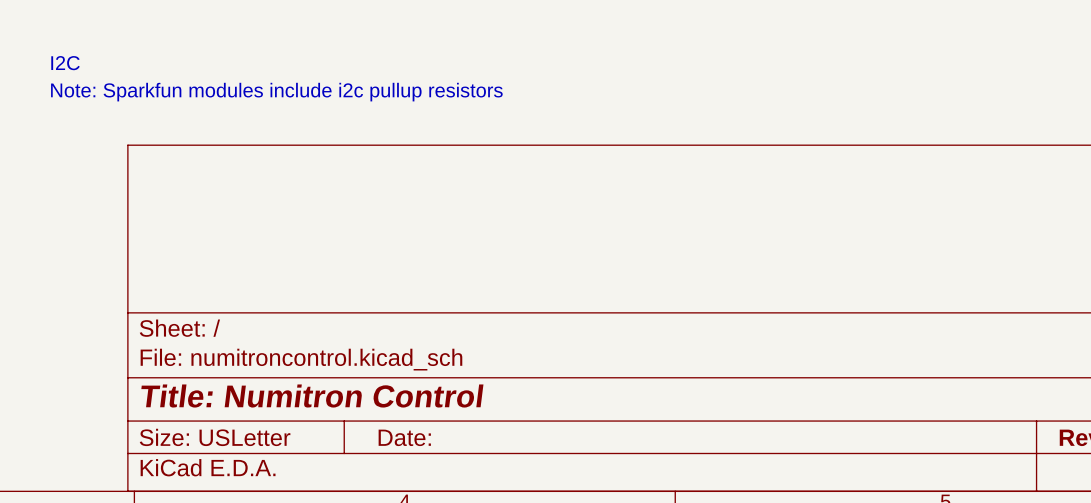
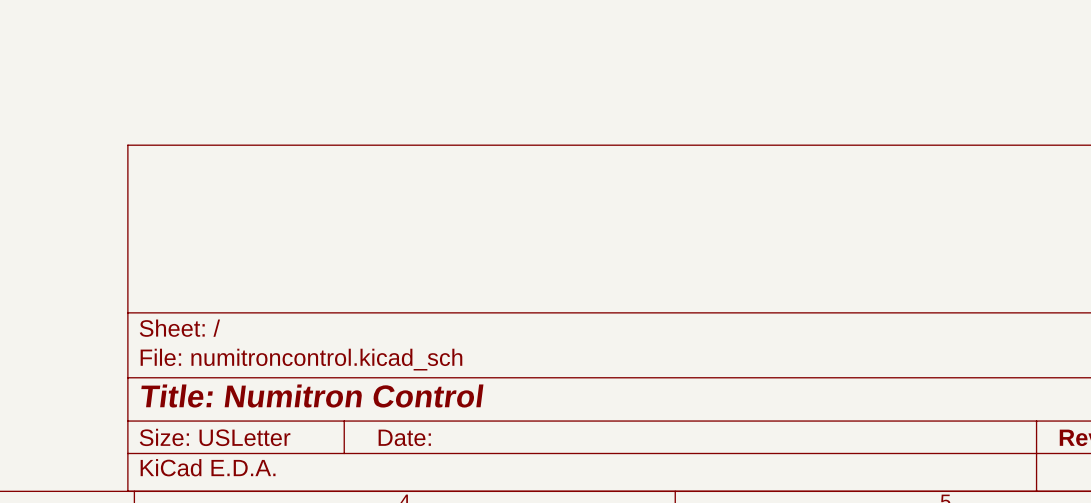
text: I2C (65, 63) -> none
text: Note: Sparkfun modules include i2c pullup resistors (276, 92) -> none

